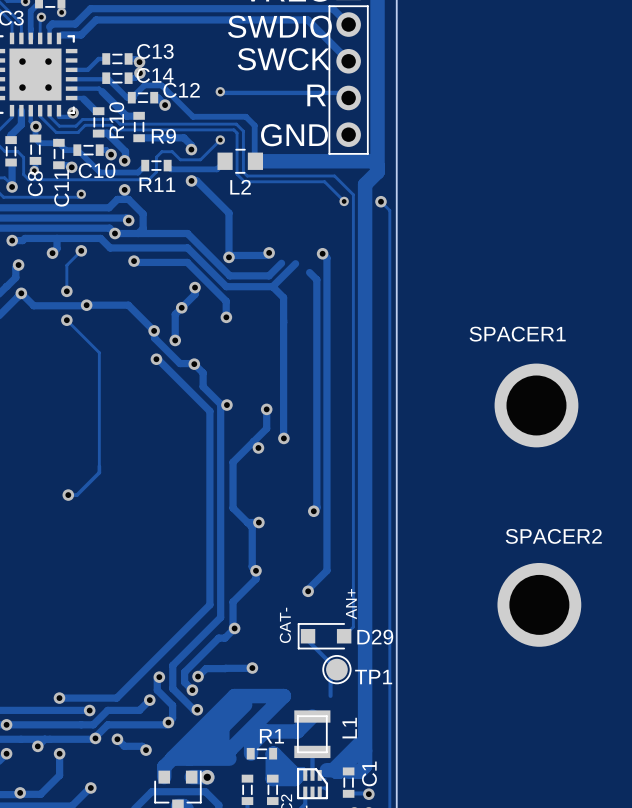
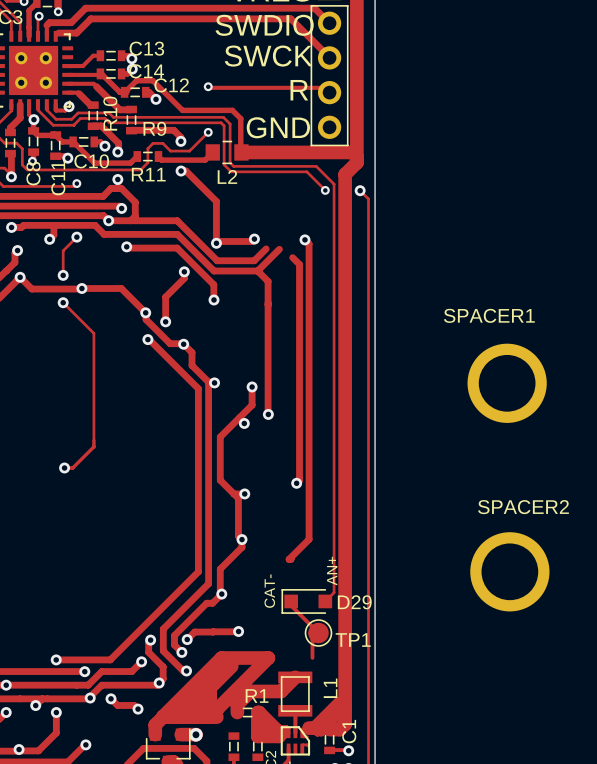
via: (181, 307) -> none
via: (308, 591) -> none

